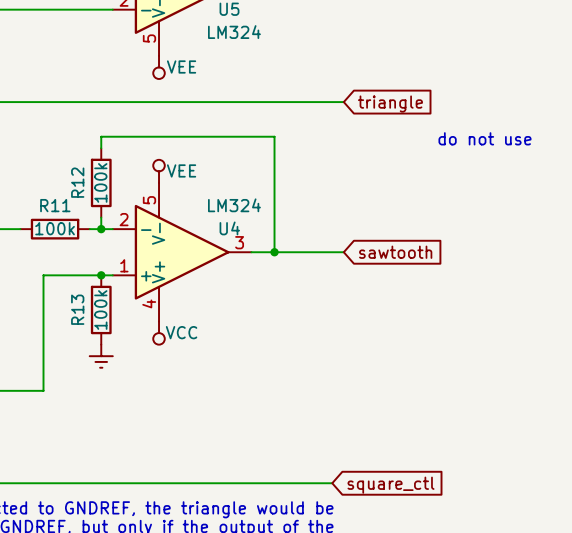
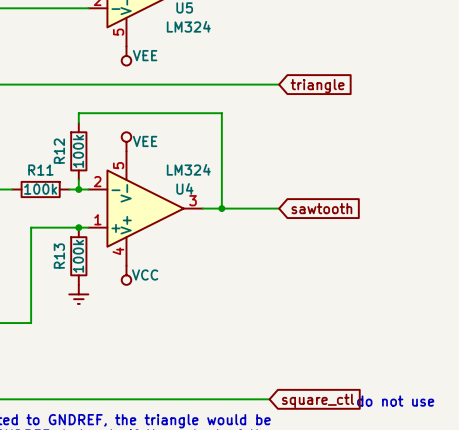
text: do not use (484, 138) -> none
text: none -> do not use (395, 401)

